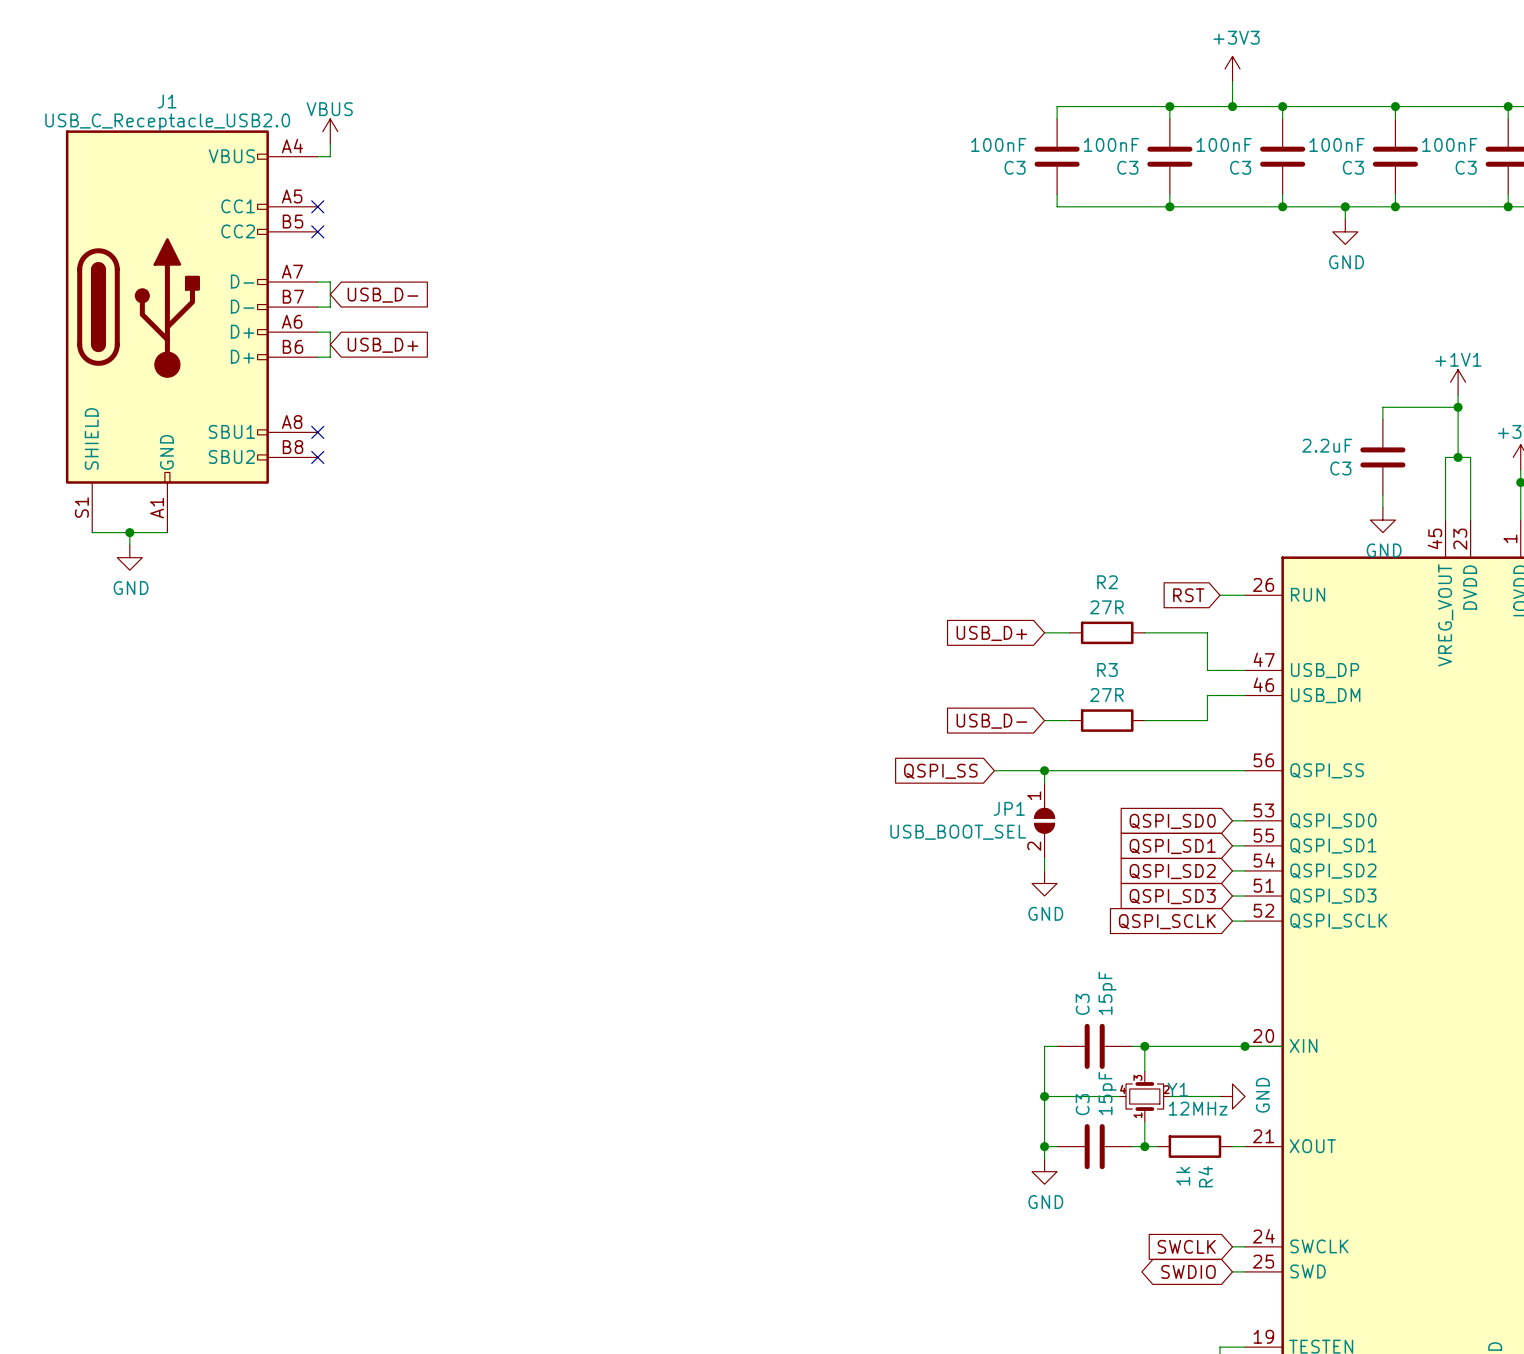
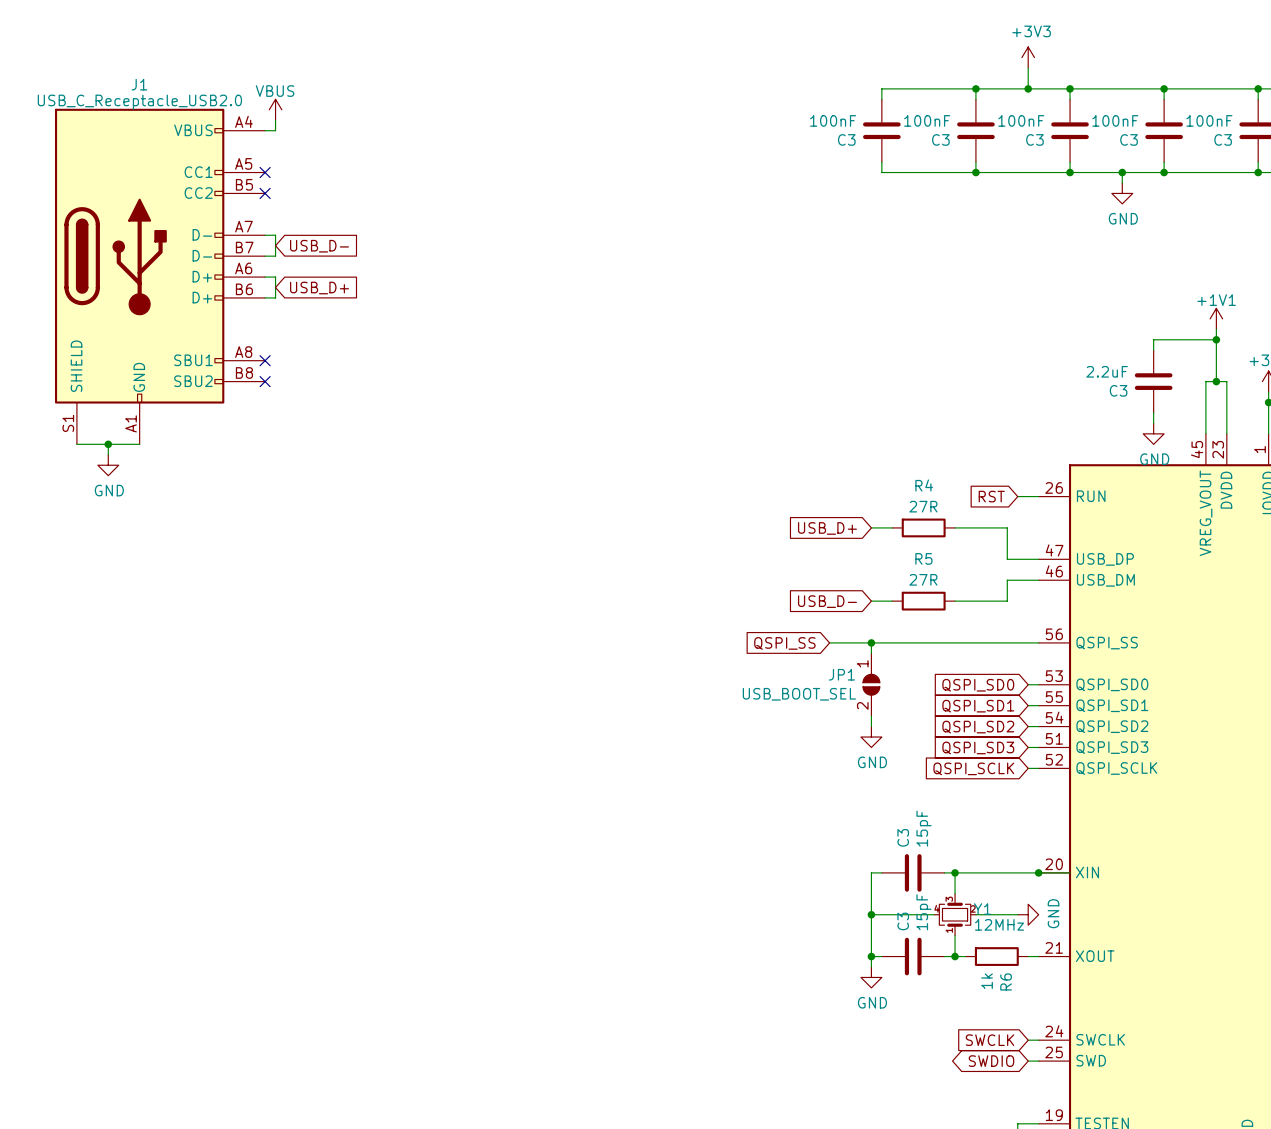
R2 name: R2 (1107, 582) -> R4 (924, 485)
R3 name: R3 (1107, 669) -> R5 (923, 558)
R4 name: R4 (1205, 1176) -> R6 (1006, 981)

